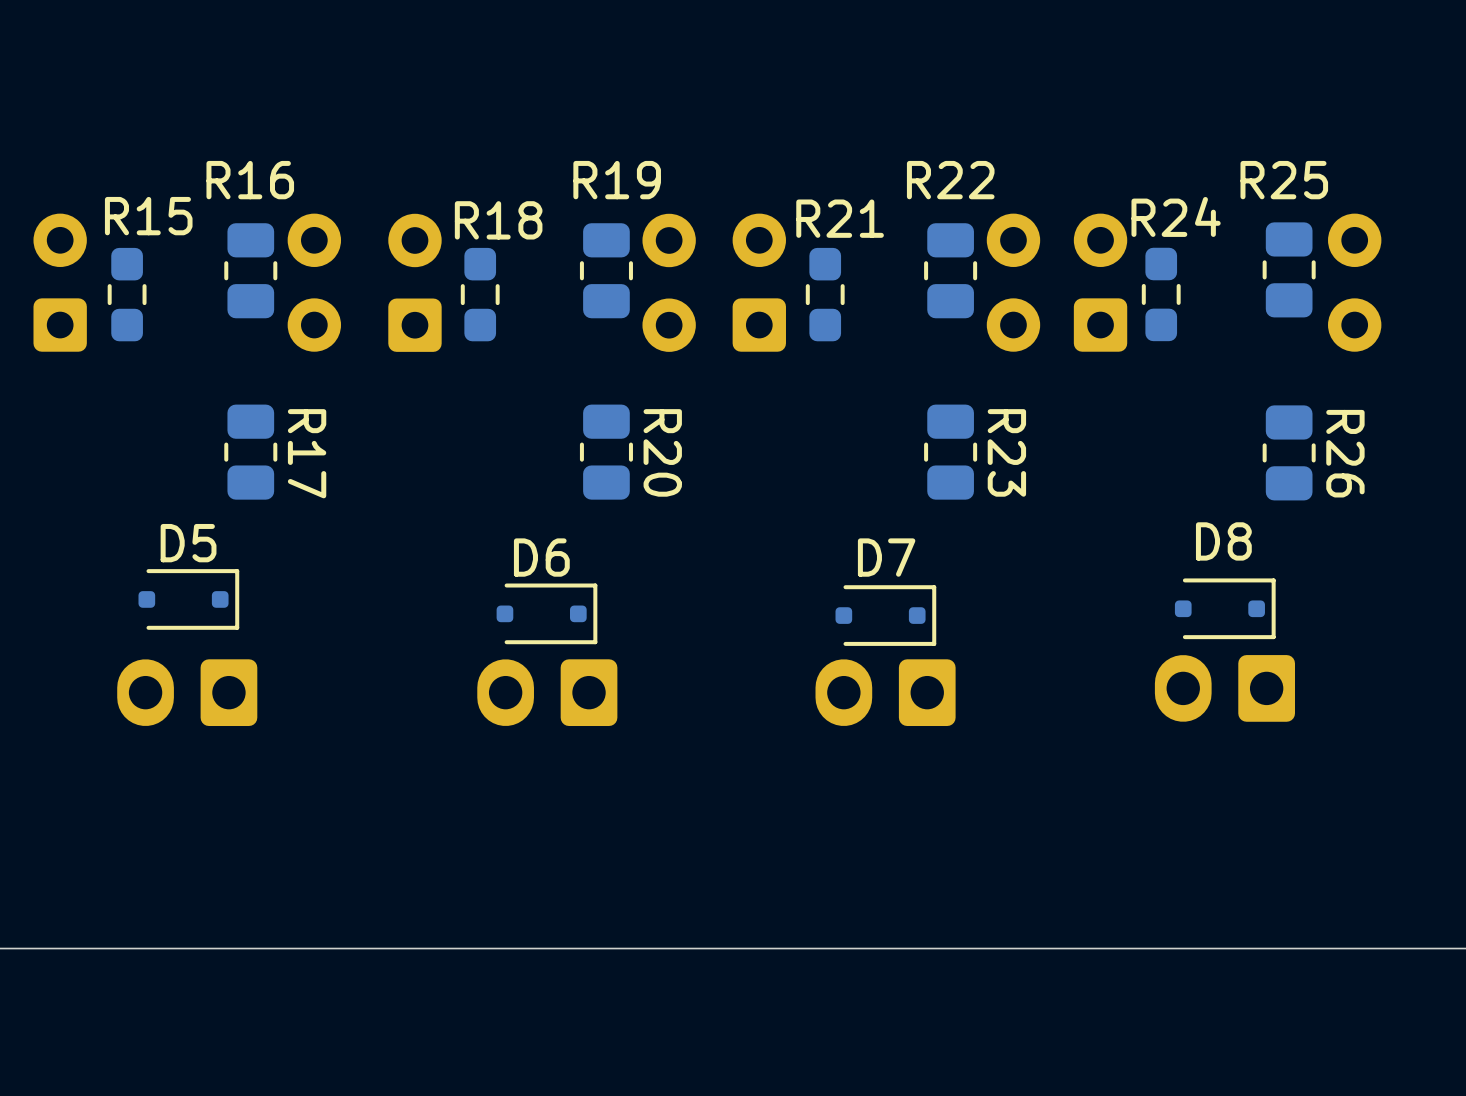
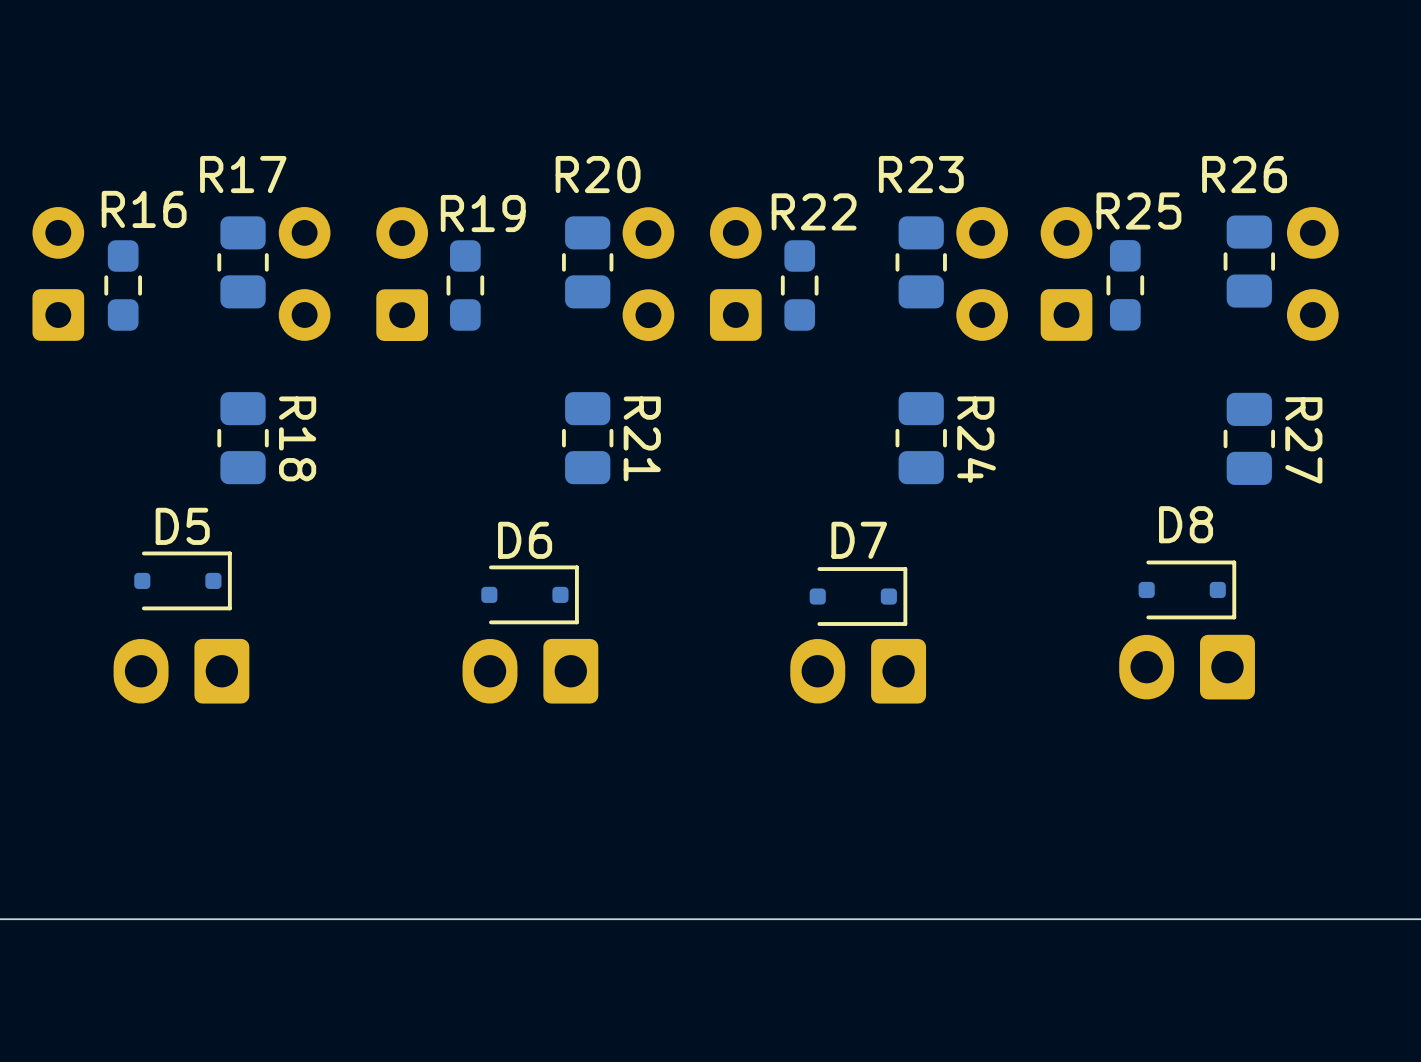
R16 name: R16 (250, 180) -> R17 (243, 174)
R19 name: R19 (617, 180) -> R20 (598, 174)
R22 name: R22 (950, 180) -> R23 (921, 174)
R25 name: R25 (1284, 180) -> R26 (1244, 174)
R15 name: R15 (148, 216) -> R16 (144, 209)
R24 name: R24 (1176, 216) -> R25 (1138, 211)
R21 name: R21 (840, 218) -> R22 (814, 211)
R18 name: R18 (498, 220) -> R19 (483, 213)
R20 name: R20 (662, 452) -> R21 (642, 438)
R23 name: R23 (1006, 452) -> R24 (976, 439)
R17 name: R17 (307, 453) -> R18 (297, 438)
R26 name: R26 (1345, 453) -> R27 (1303, 440)

